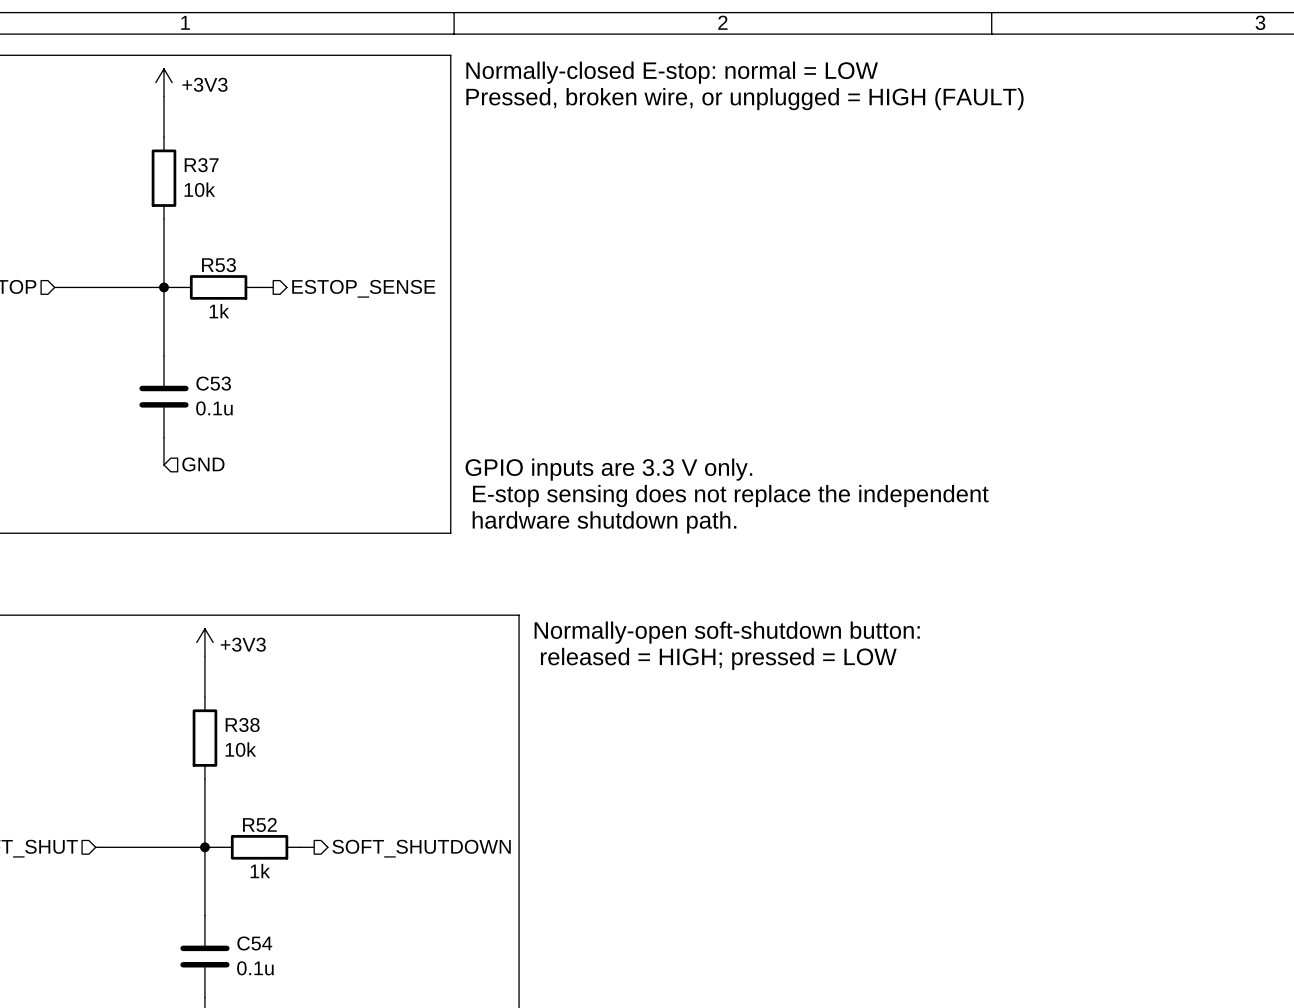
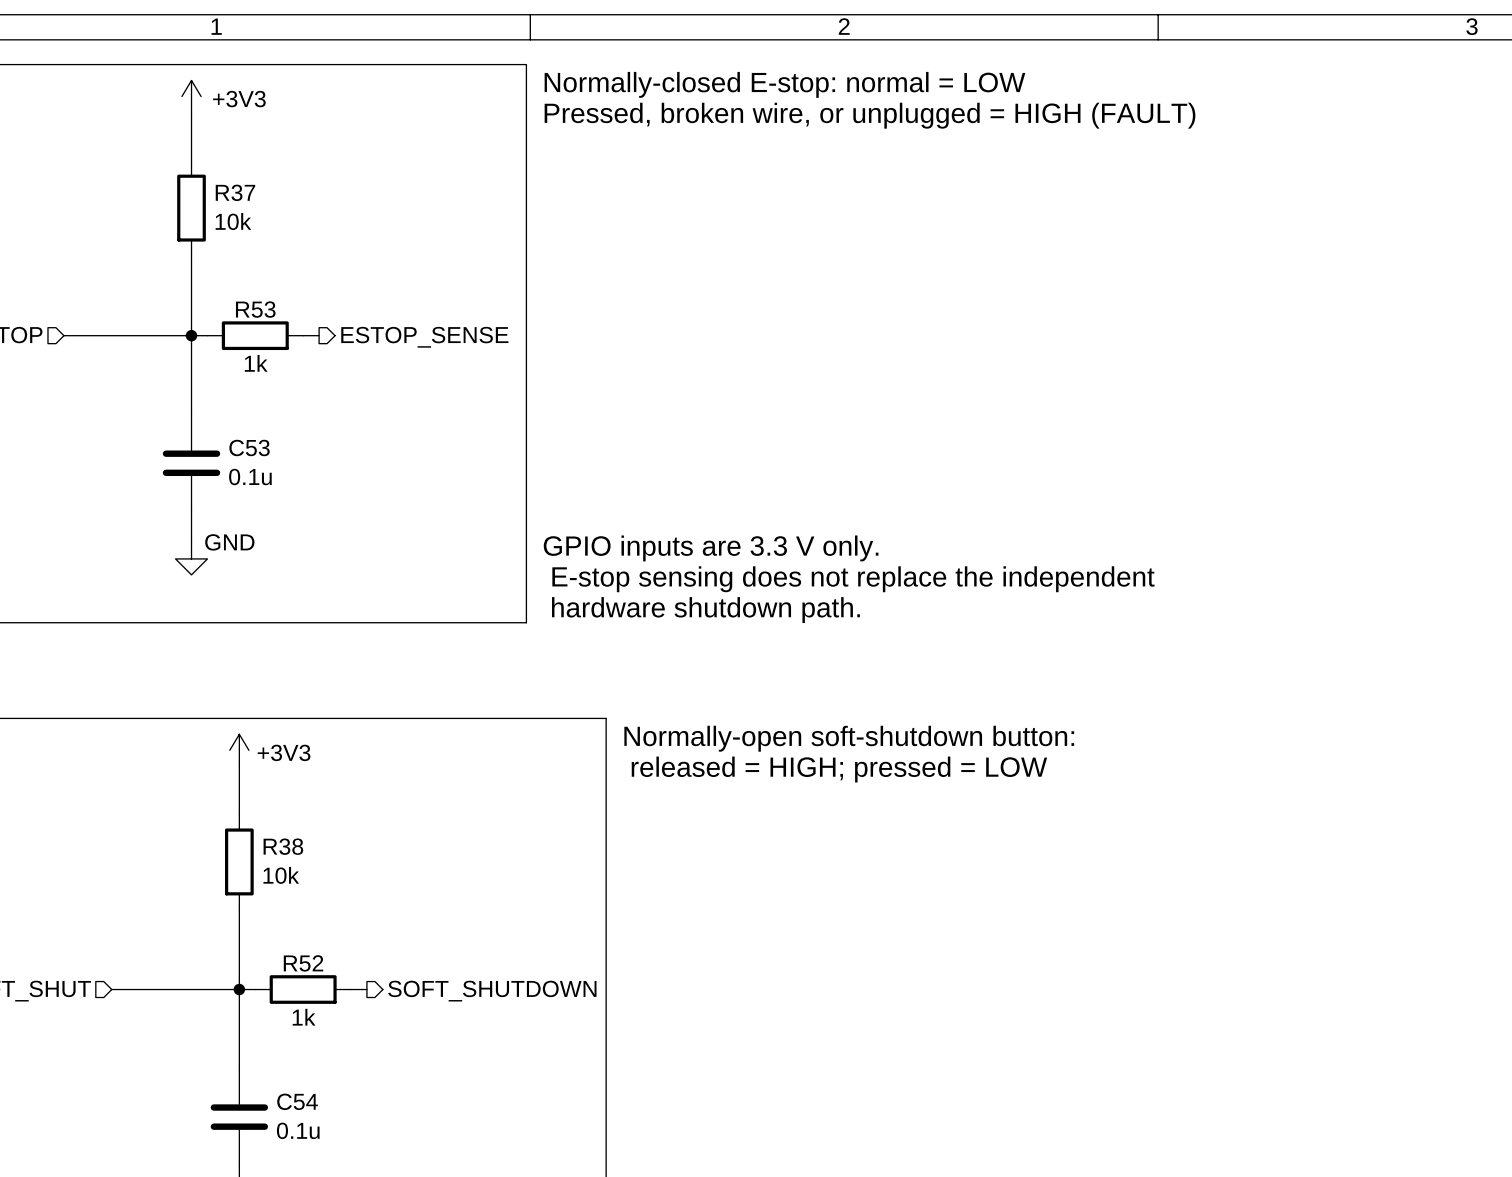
hierarchical label: GND (203, 464) -> none
power symbol: none -> GND (191, 558)

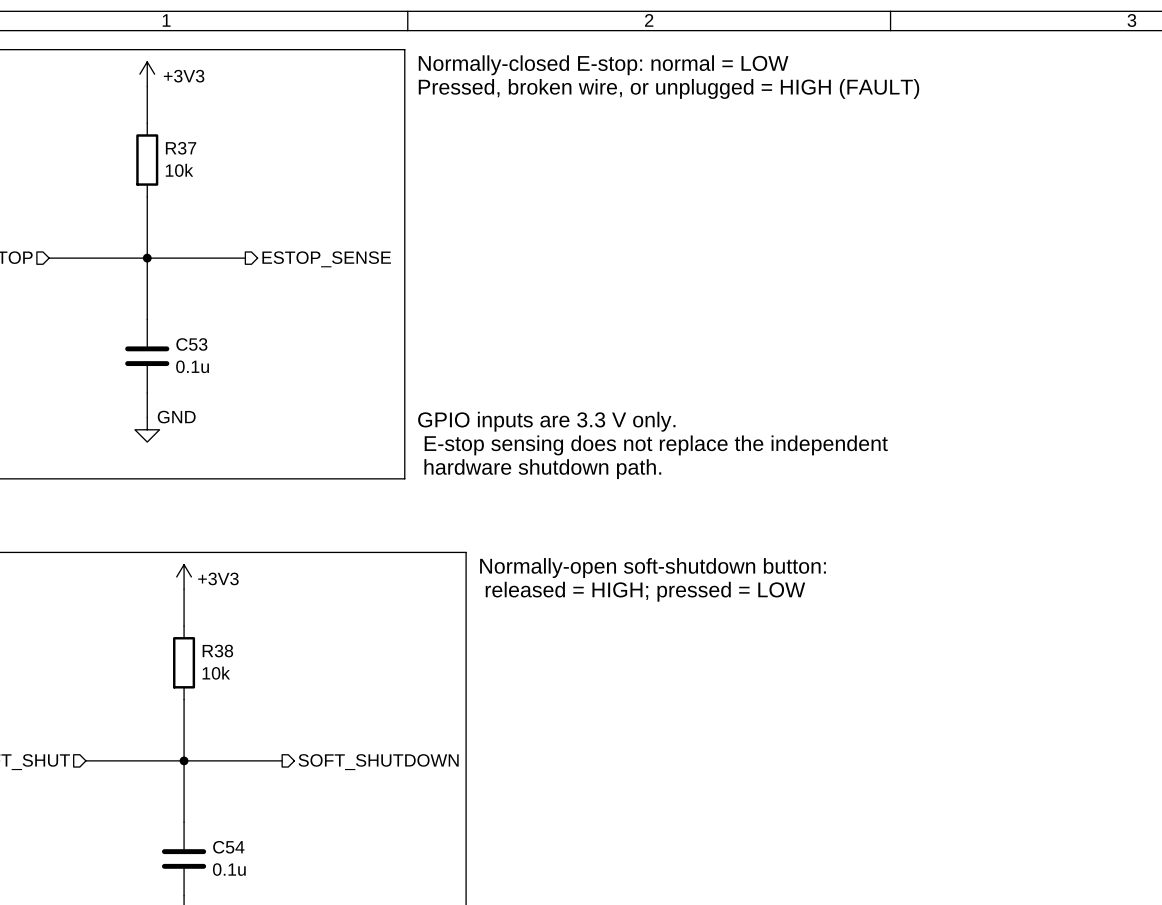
wire: none -> (159, 258) (233, 258)
R53: 1k (255, 335) -> none
wire: none -> (196, 760) (269, 760)
R52: 1k (303, 989) -> none

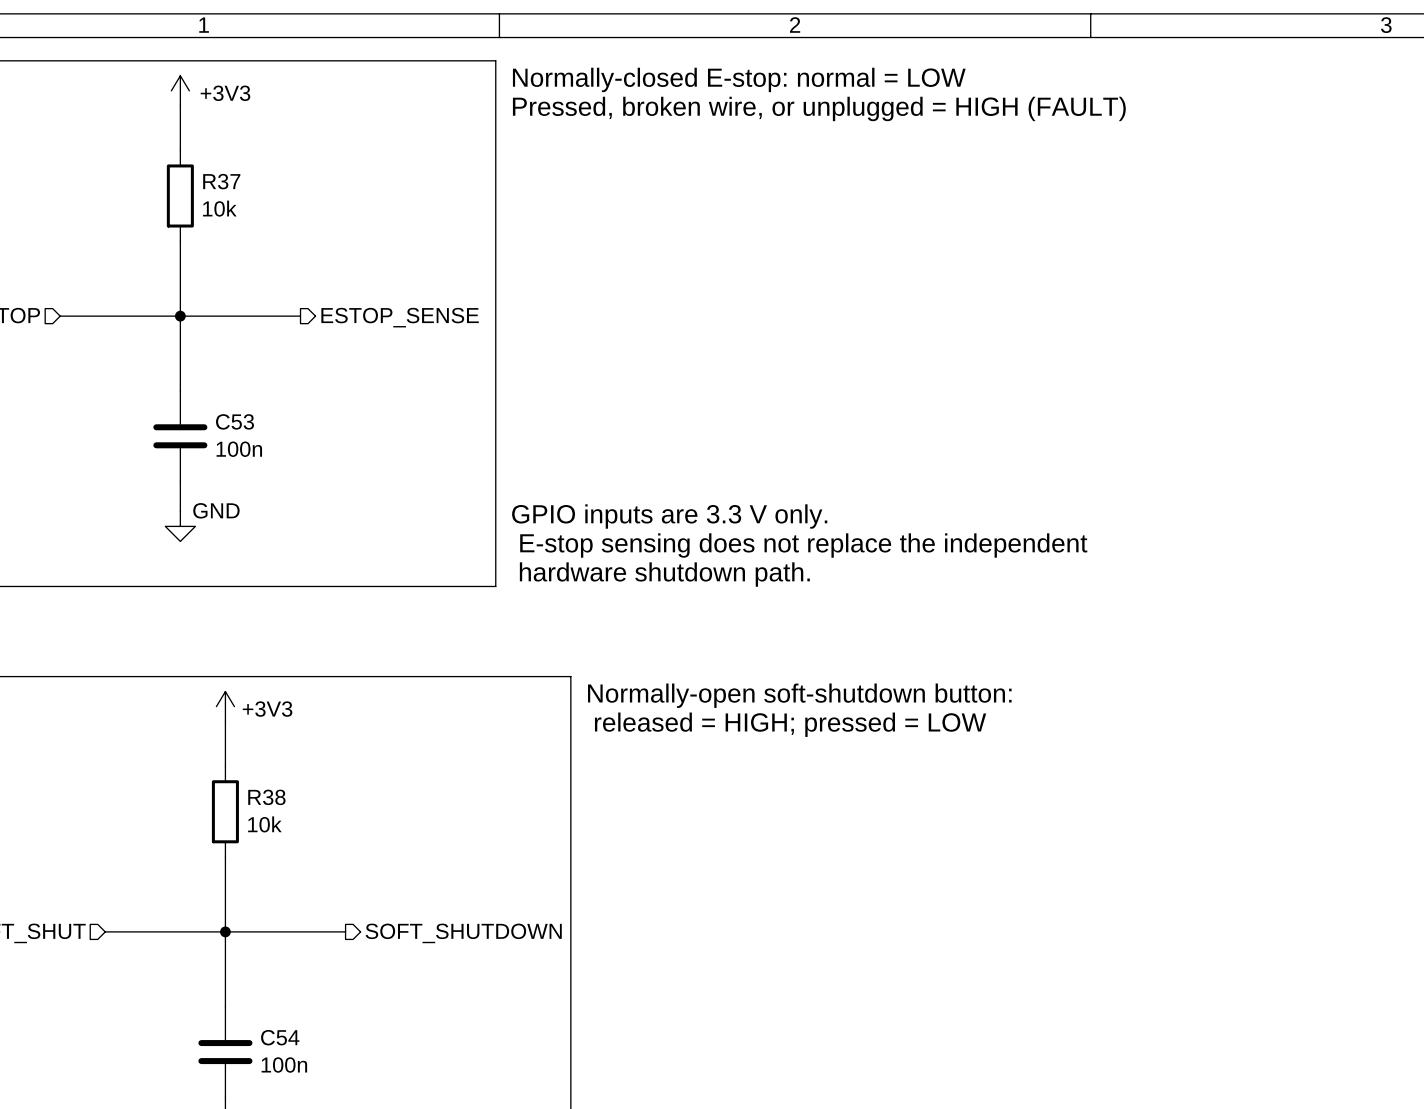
C53 value: 0.1u (192, 366) -> 100n (239, 449)
C54 value: 0.1u (229, 869) -> 100n (284, 1065)

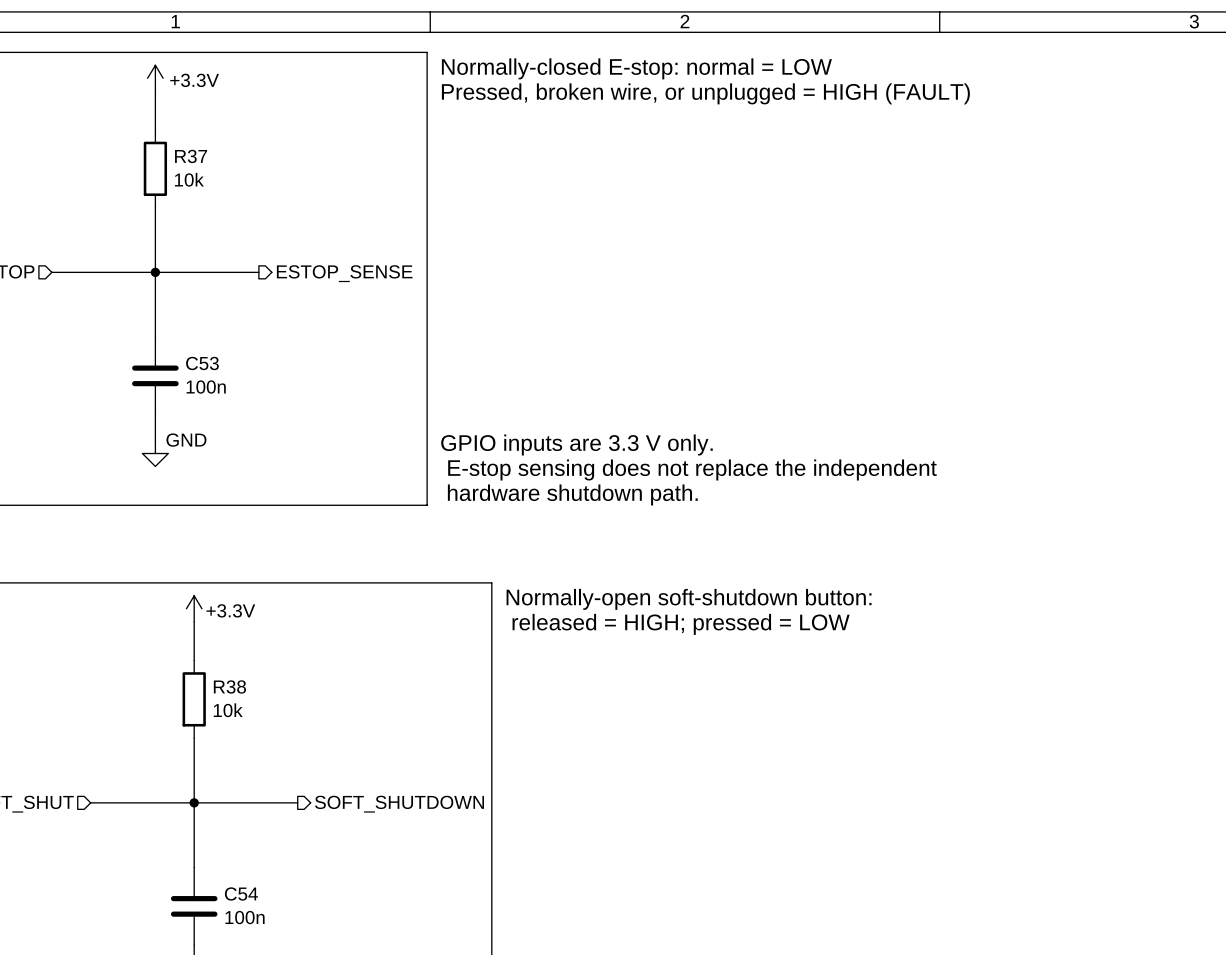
power symbol: +3V3 (180, 90) -> +3.3V (155, 78)
power symbol: +3V3 (225, 706) -> +3.3V (194, 608)

